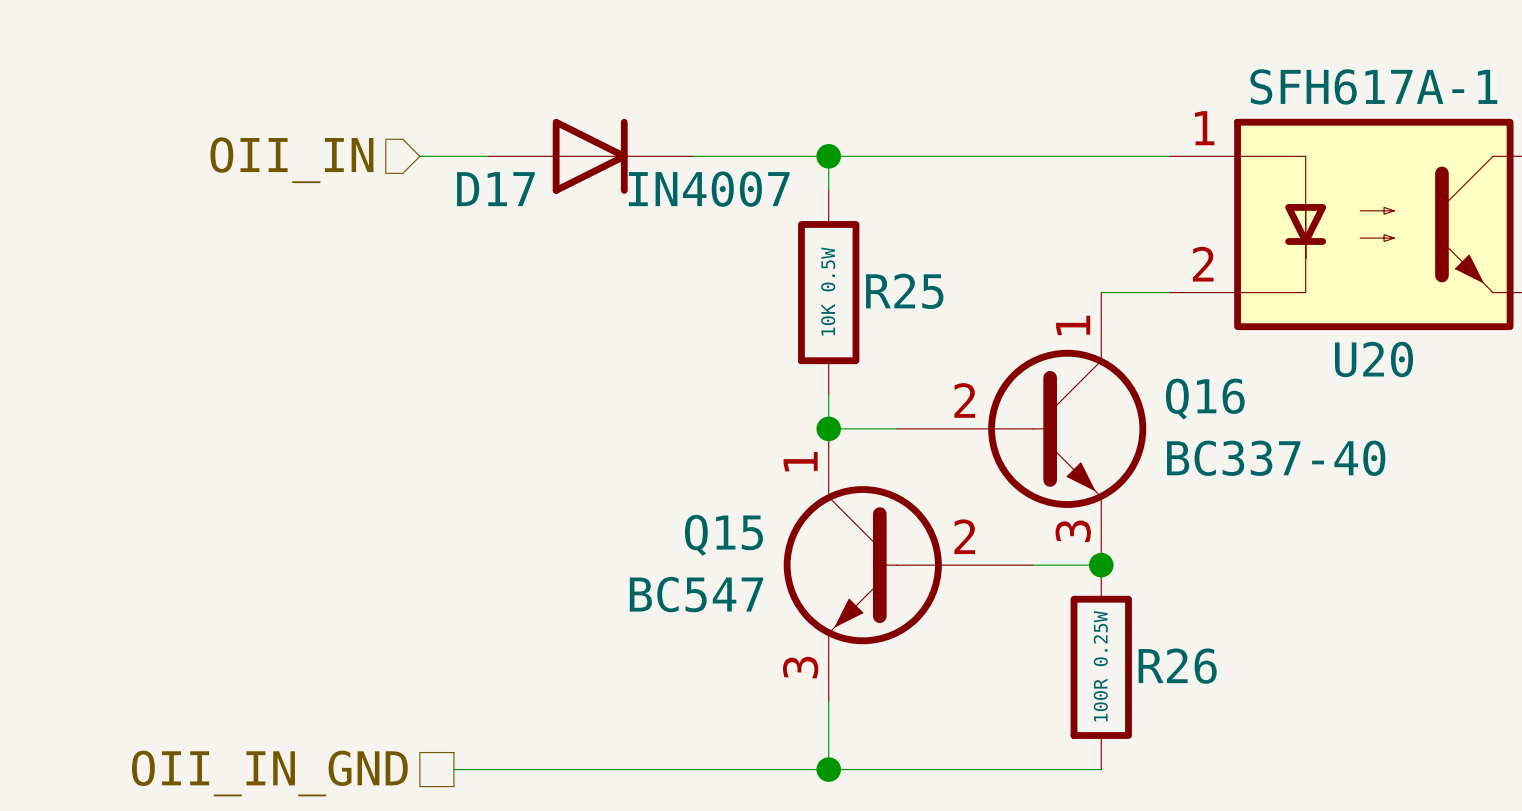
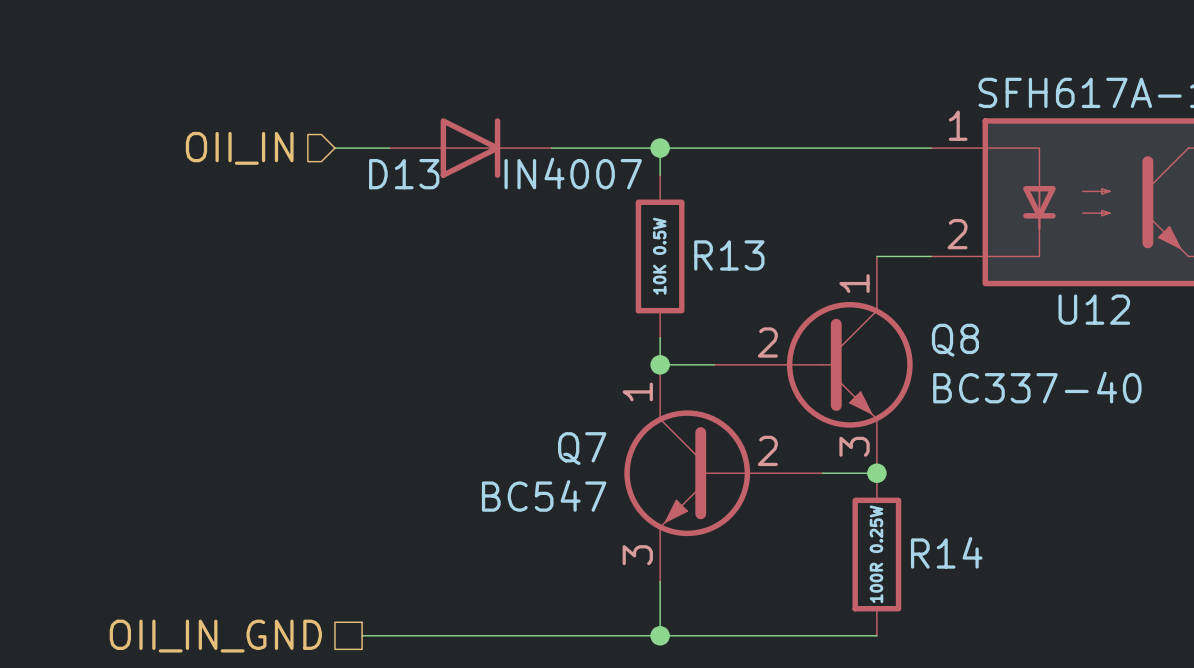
D17 name: D17 (495, 189) -> D13 (404, 174)
R25 name: R25 (904, 291) -> R13 (729, 255)
U20 name: U20 (1373, 359) -> U12 (1094, 309)
Q16 name: Q16 (1205, 399) -> Q8 (955, 340)
Q15 name: Q15 (723, 535) -> Q7 (582, 448)
R26 name: R26 (1177, 666) -> R14 (946, 552)

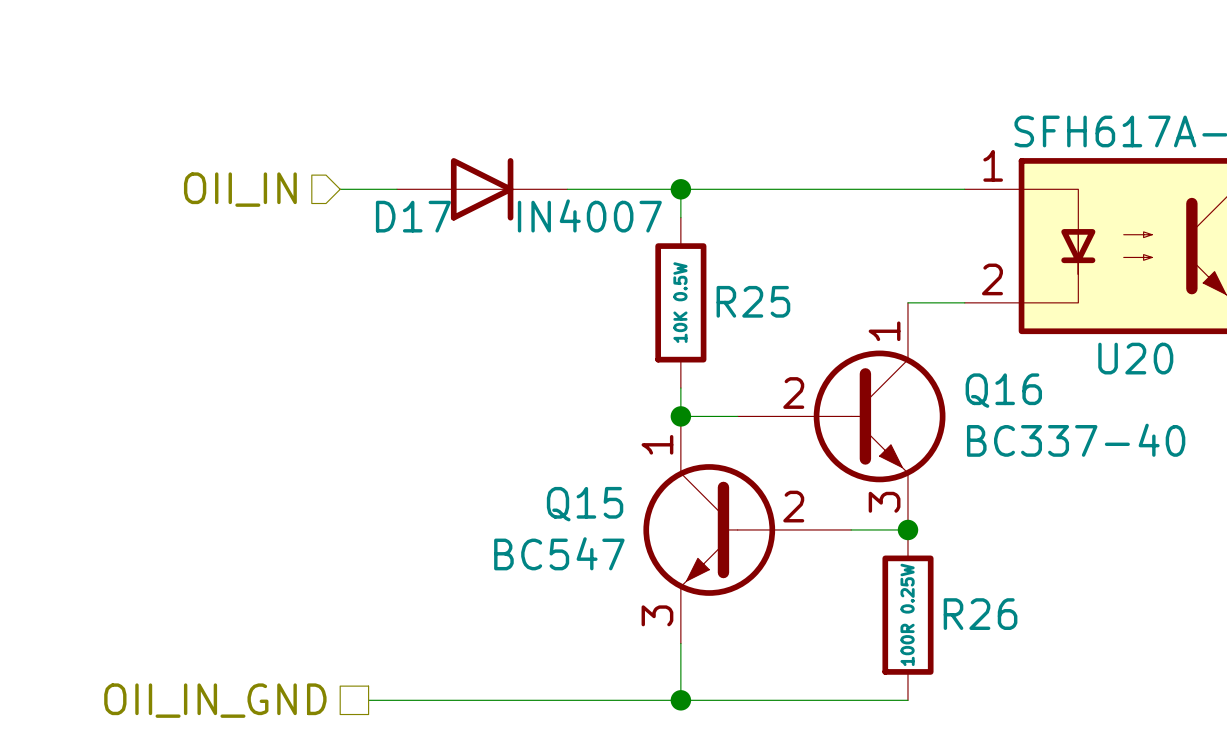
D13 name: D13 (404, 174) -> D17 (413, 216)
R13 name: R13 (729, 255) -> R25 (753, 301)
U12 name: U12 (1094, 309) -> U20 (1135, 358)
Q8 name: Q8 (955, 340) -> Q16 (1003, 390)
Q7 name: Q7 (582, 448) -> Q15 (585, 504)
R14 name: R14 (946, 552) -> R26 (980, 614)

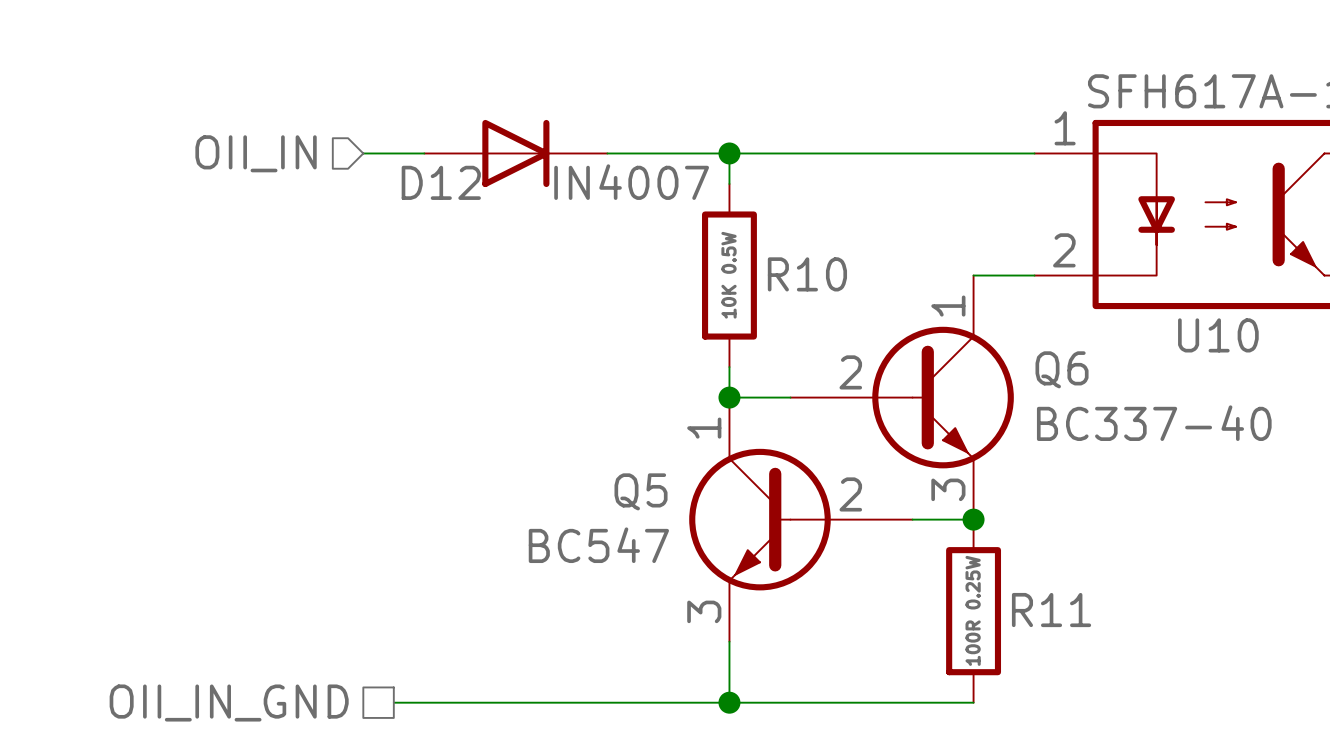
D17 name: D17 (413, 216) -> D12 (441, 182)
R25 name: R25 (753, 301) -> R10 (807, 274)
U20 name: U20 (1135, 358) -> U10 (1218, 335)
Q16 name: Q16 (1003, 390) -> Q6 (1062, 369)
Q15 name: Q15 (585, 504) -> Q5 (641, 491)
R26 name: R26 (980, 614) -> R11 (1051, 610)

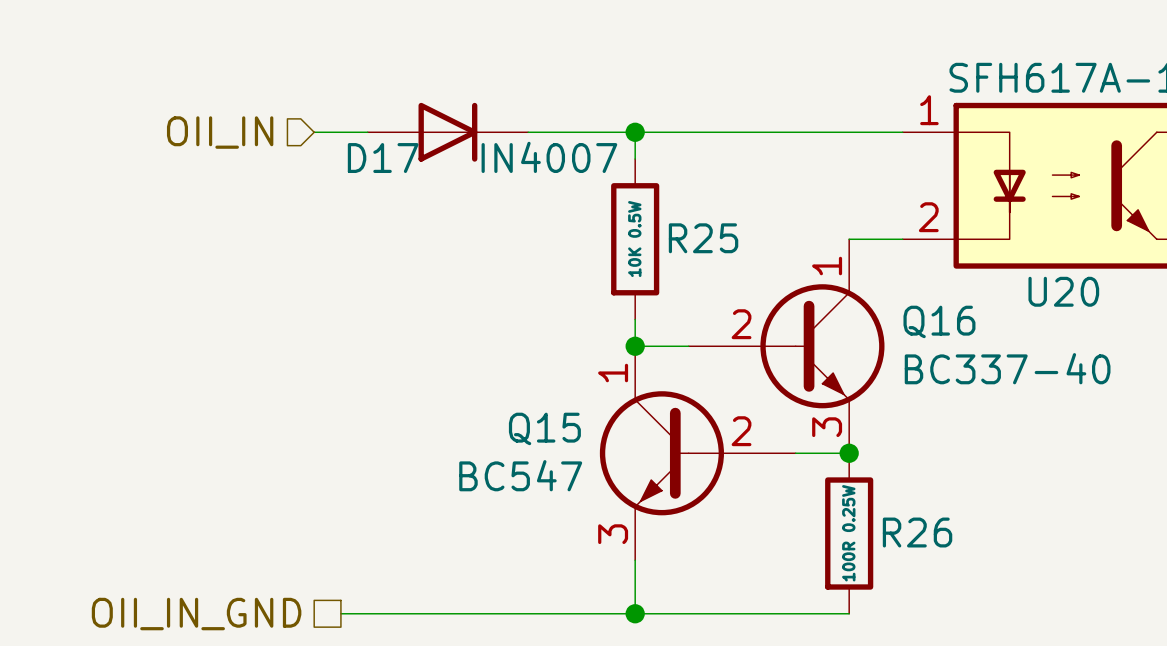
D12 name: D12 (441, 182) -> D17 (383, 158)
R10 name: R10 (807, 274) -> R25 (703, 238)
U10 name: U10 (1218, 335) -> U20 (1063, 291)
Q6 name: Q6 (1062, 369) -> Q16 (939, 321)
Q5 name: Q5 (641, 491) -> Q15 (544, 428)
R11 name: R11 (1051, 610) -> R26 (917, 532)

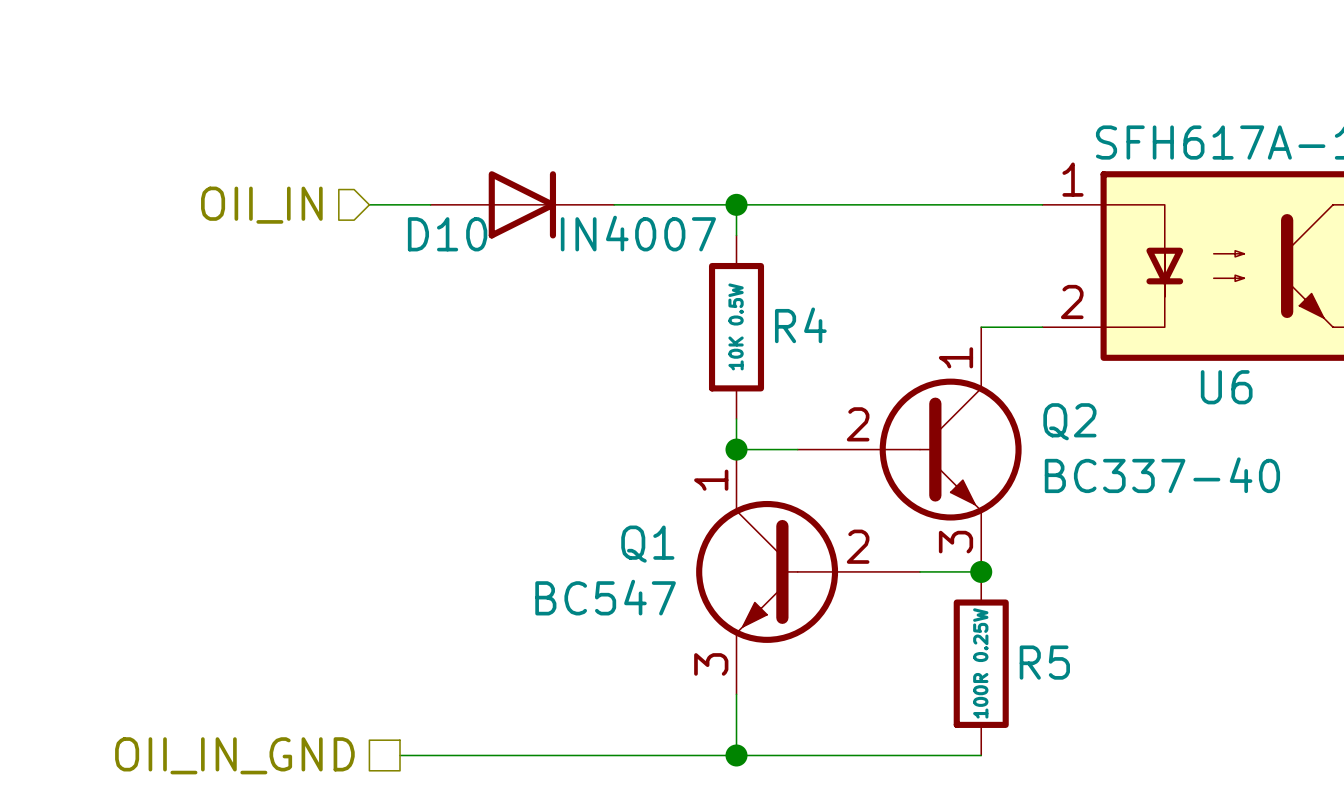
D17 name: D17 (383, 158) -> D10 (447, 234)
R25 name: R25 (703, 238) -> R4 (800, 325)
U20 name: U20 (1063, 291) -> U6 (1226, 387)
Q16 name: Q16 (939, 321) -> Q2 (1069, 421)
Q15 name: Q15 (544, 428) -> Q1 (647, 544)
R26 name: R26 (917, 532) -> R5 (1044, 662)

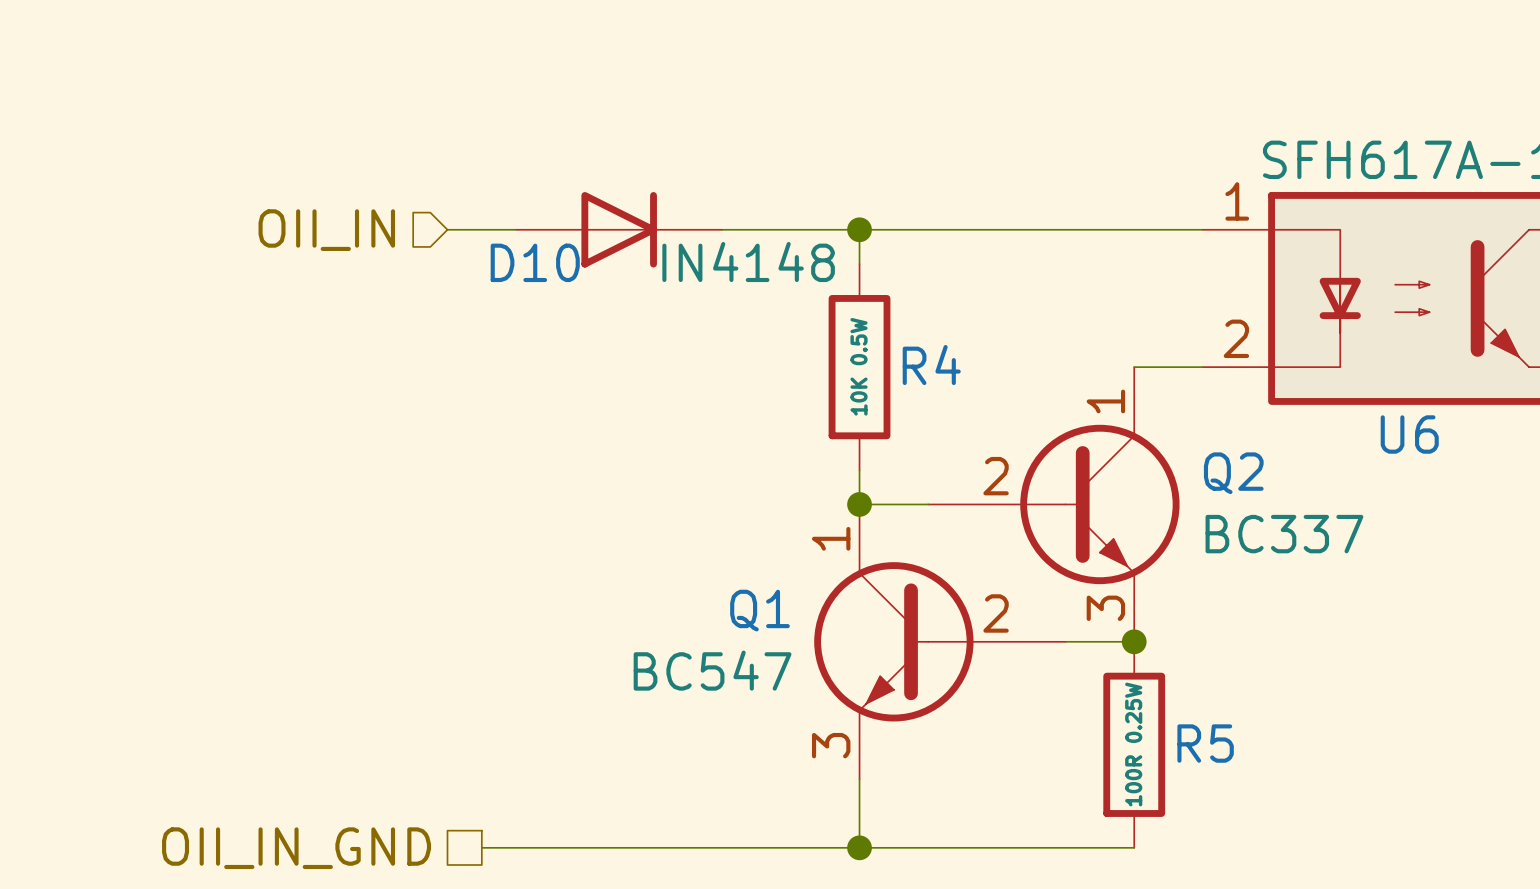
D10 value: IN4007 (638, 233) -> IN4148 (748, 262)
Q2 value: BC337-40 (1162, 475) -> BC337 (1284, 534)

